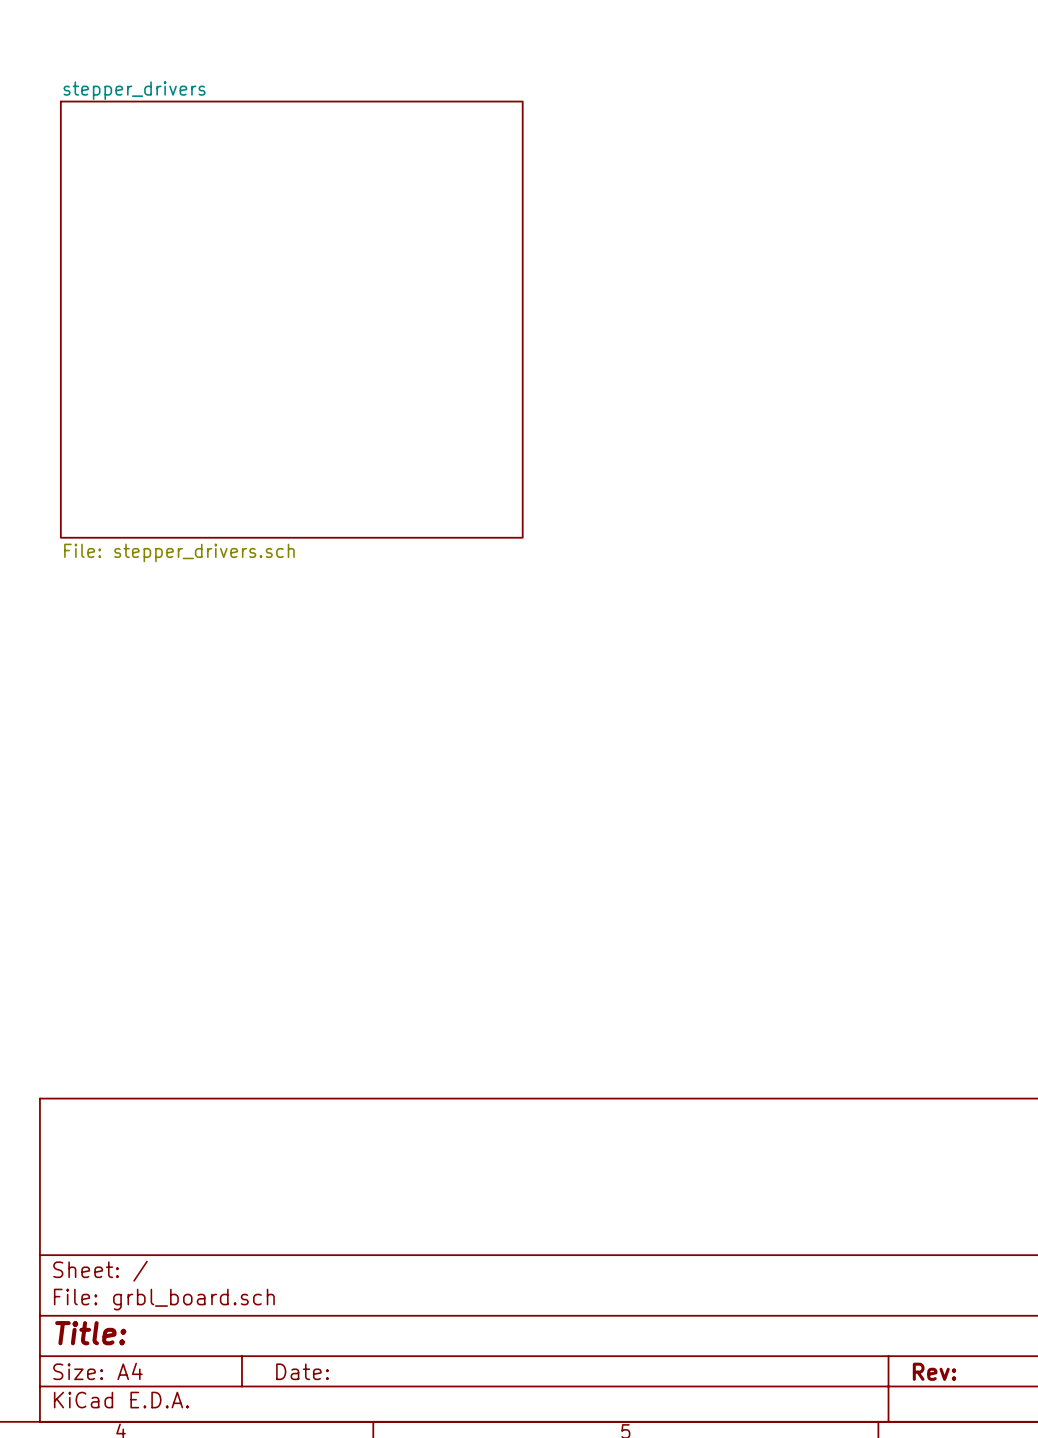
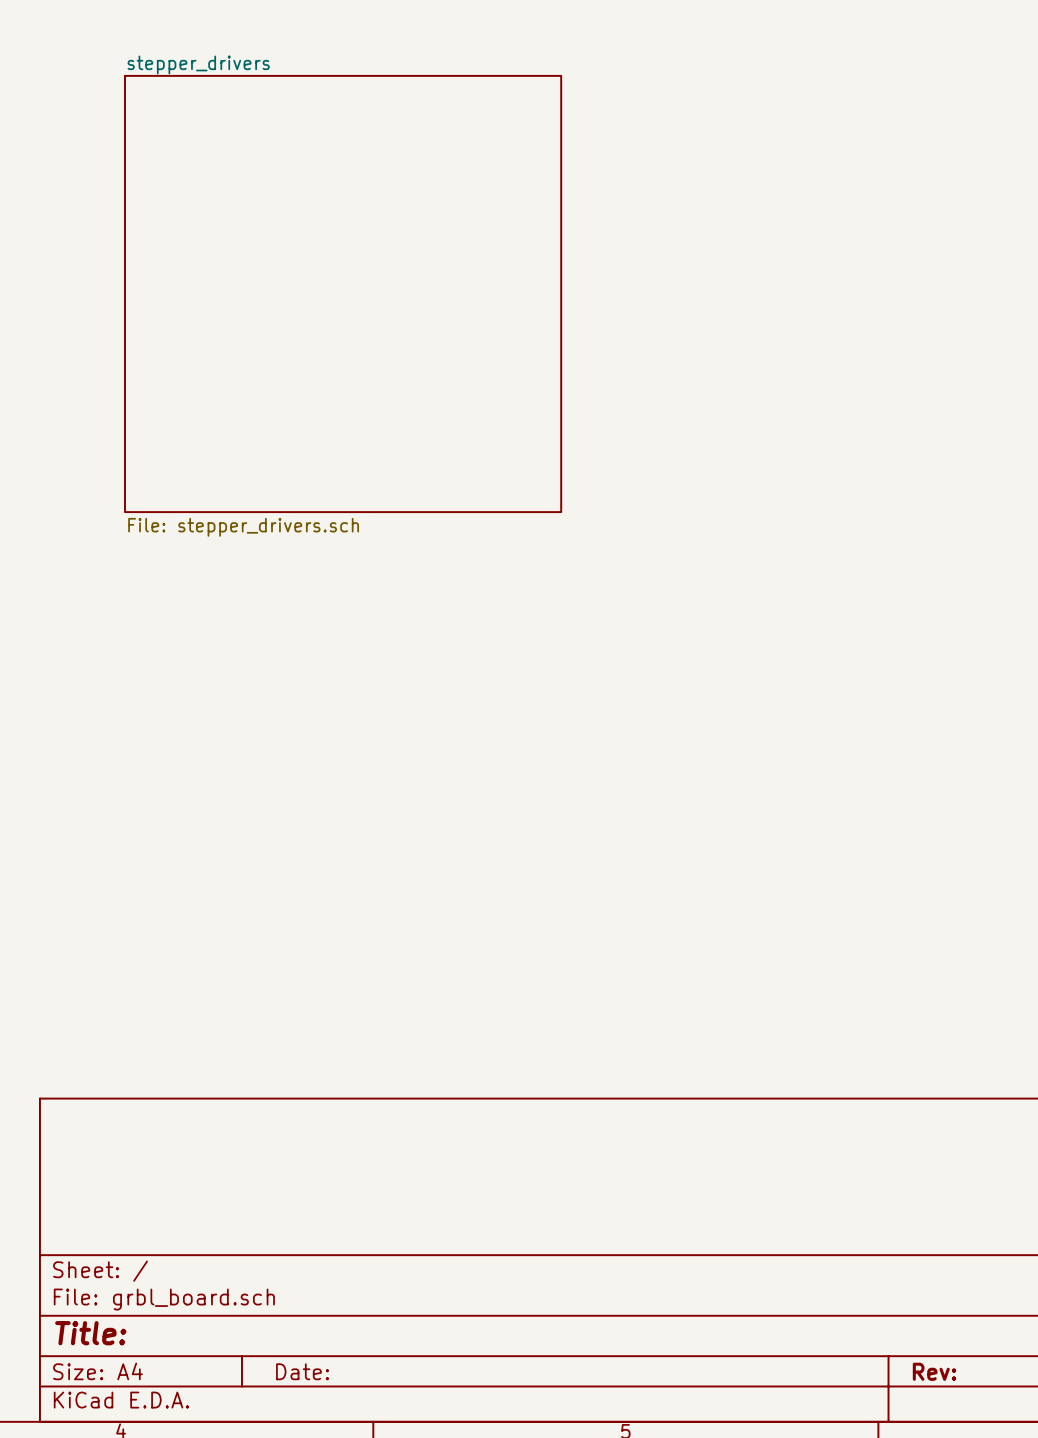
sheet stepper_drivers: none -> File: stepper_drivers.sch (343, 293)
sheet stepper_drivers: File: stepper_drivers.sch (291, 319) -> none

